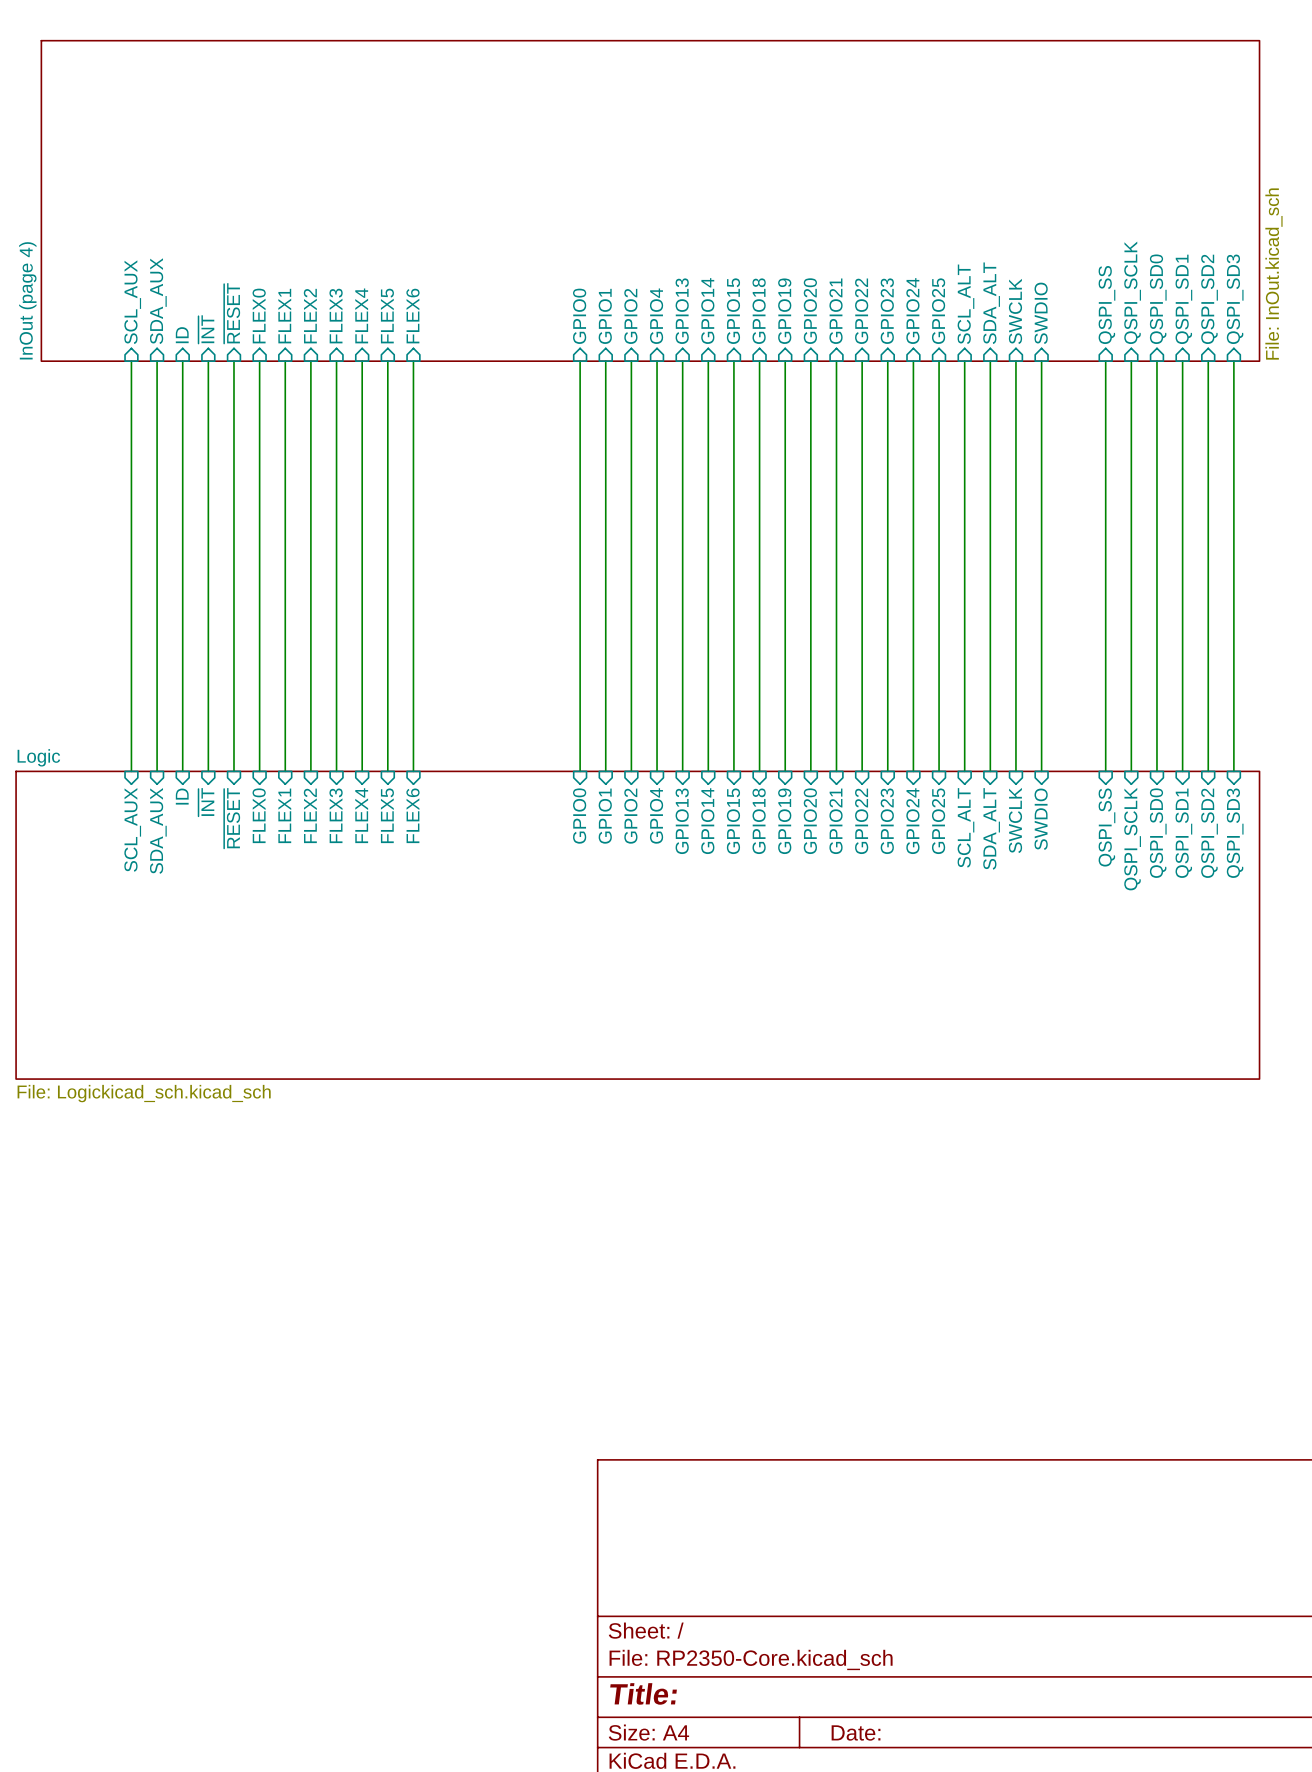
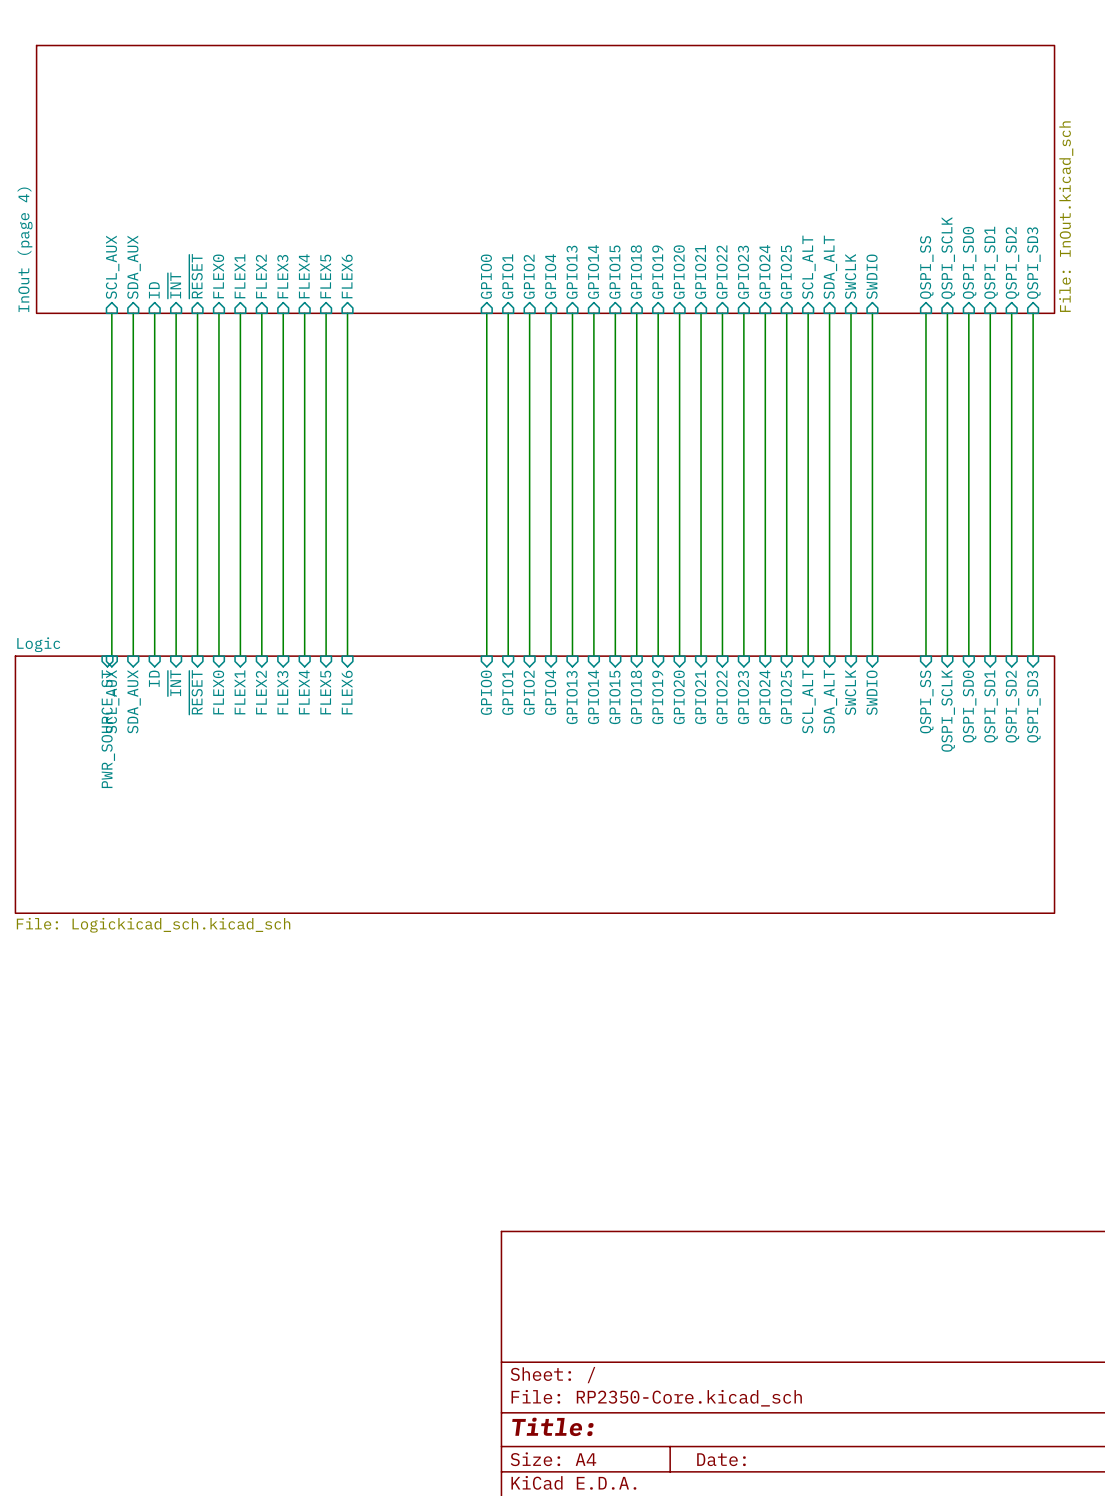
sheet pin: none -> PWR_SOURCE_ST (108, 729)

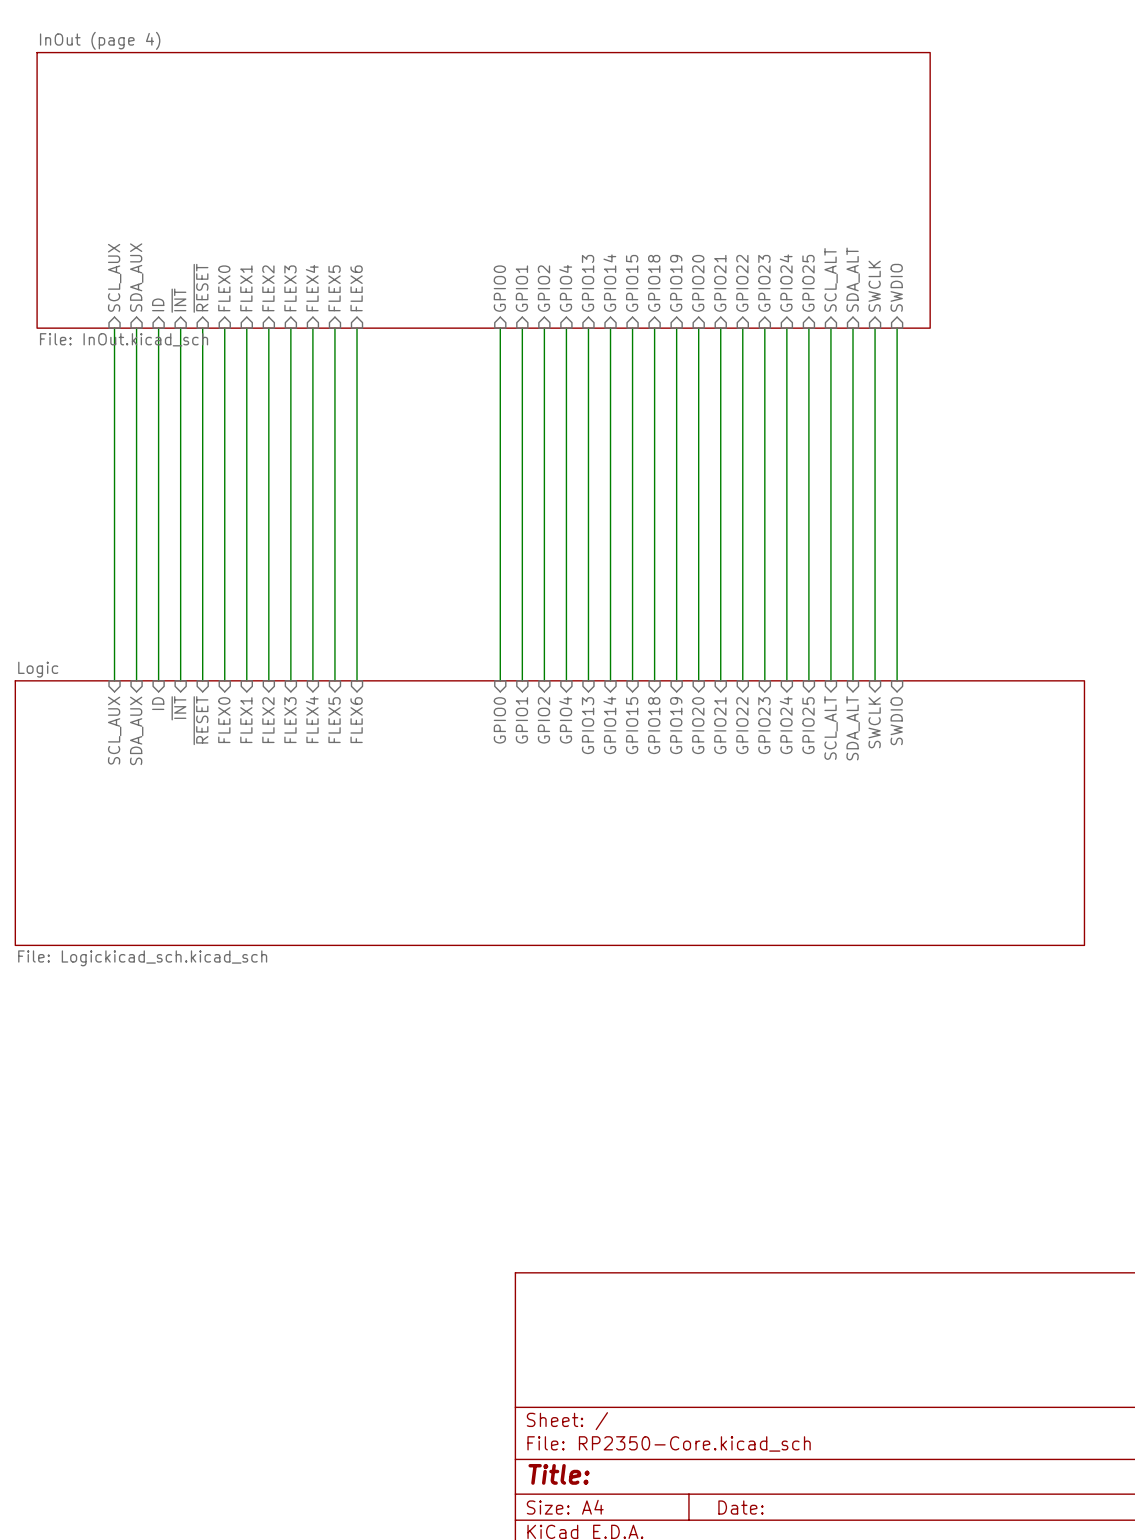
sheet InOut (page 4) shape: [35, 44, 1056, 314] -> [36, 51, 931, 329]
sheet InOut (page 4) value position: File: InOut.kicad_sch (1066, 216) -> File: InOut.kicad_sch (124, 339)
sheet InOut (page 4) name position: InOut (page 4) (25, 249) -> InOut (page 4) (100, 40)
sheet pin: QSPI_SCLK (948, 258) -> none
sheet pin: QSPI_SD0 (969, 262) -> none
sheet pin: QSPI_SD1 (991, 262) -> none
sheet pin: QSPI_SD2 (1012, 262) -> none
sheet pin: QSPI_SD3 (1033, 263) -> none
sheet pin: QSPI_SS (926, 267) -> none
wire: (925, 313) (925, 656) -> none
wire: (947, 313) (947, 656) -> none
wire: (968, 313) (968, 656) -> none
wire: (990, 313) (990, 656) -> none
wire: (1011, 313) (1011, 656) -> none
wire: (1033, 313) (1033, 656) -> none
sheet pin: QSPI_SS (926, 701) -> none
sheet pin: QSPI_SD0 (969, 706) -> none
sheet pin: QSPI_SD1 (991, 706) -> none
sheet pin: QSPI_SD2 (1012, 706) -> none
sheet pin: QSPI_SD3 (1033, 706) -> none
sheet pin: QSPI_SCLK (948, 710) -> none
sheet pin: PWR_SOURCE_ST (108, 729) -> none

